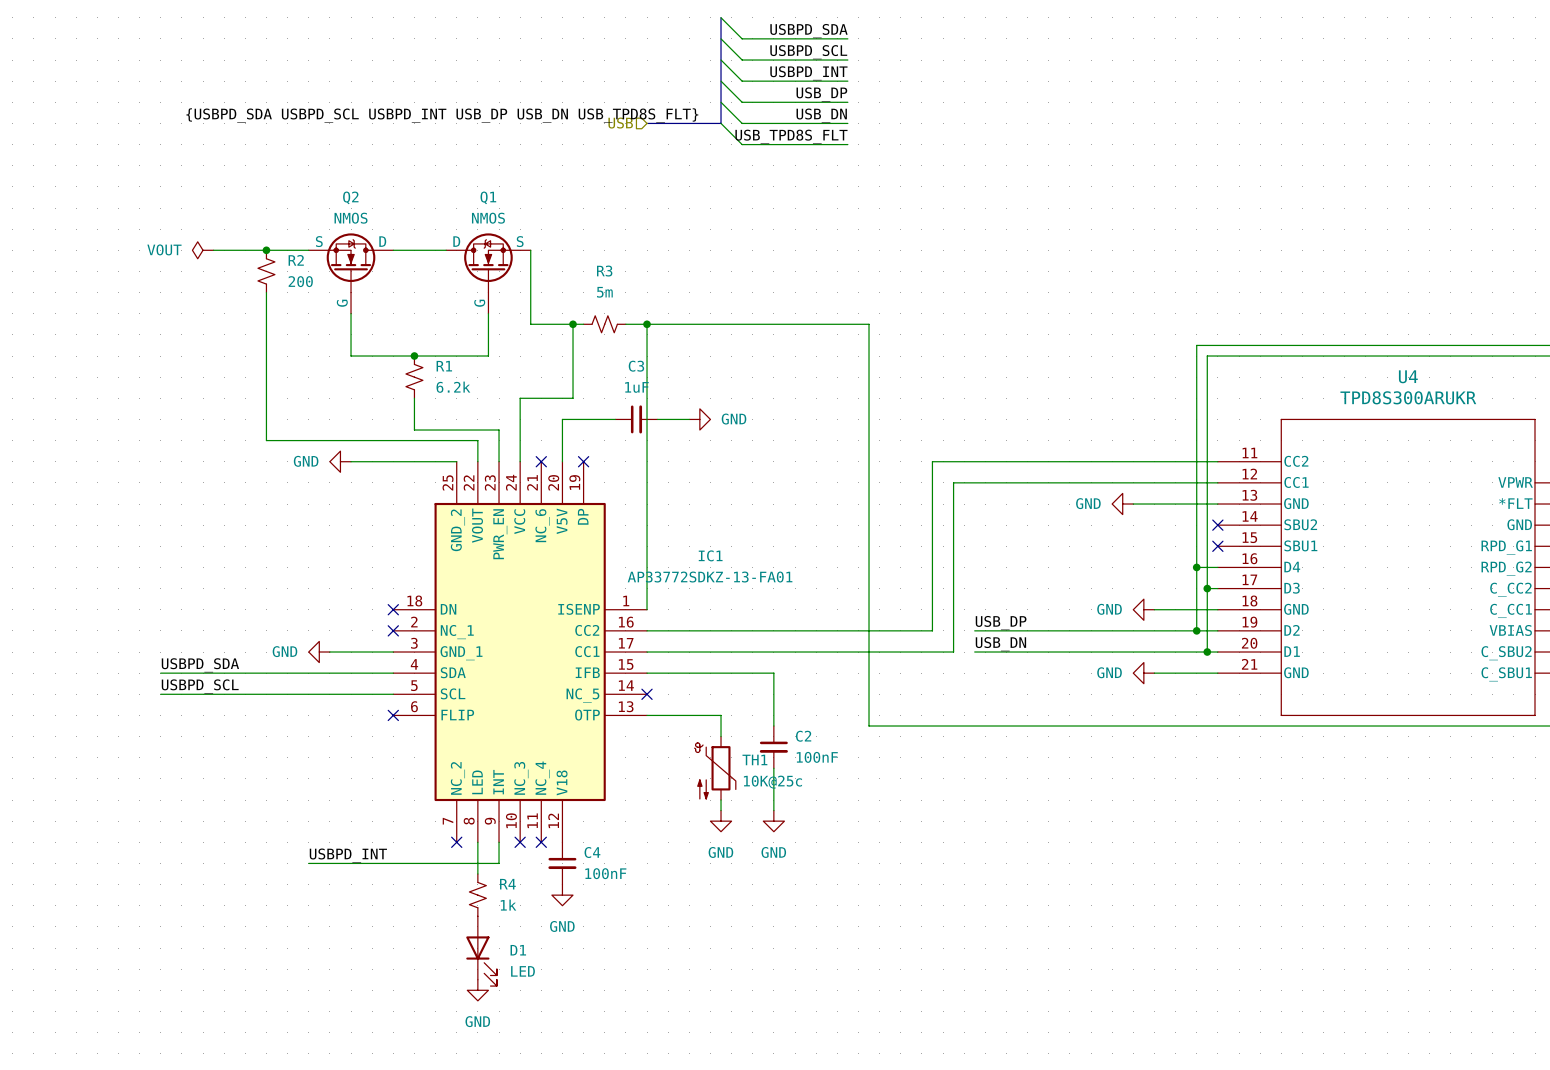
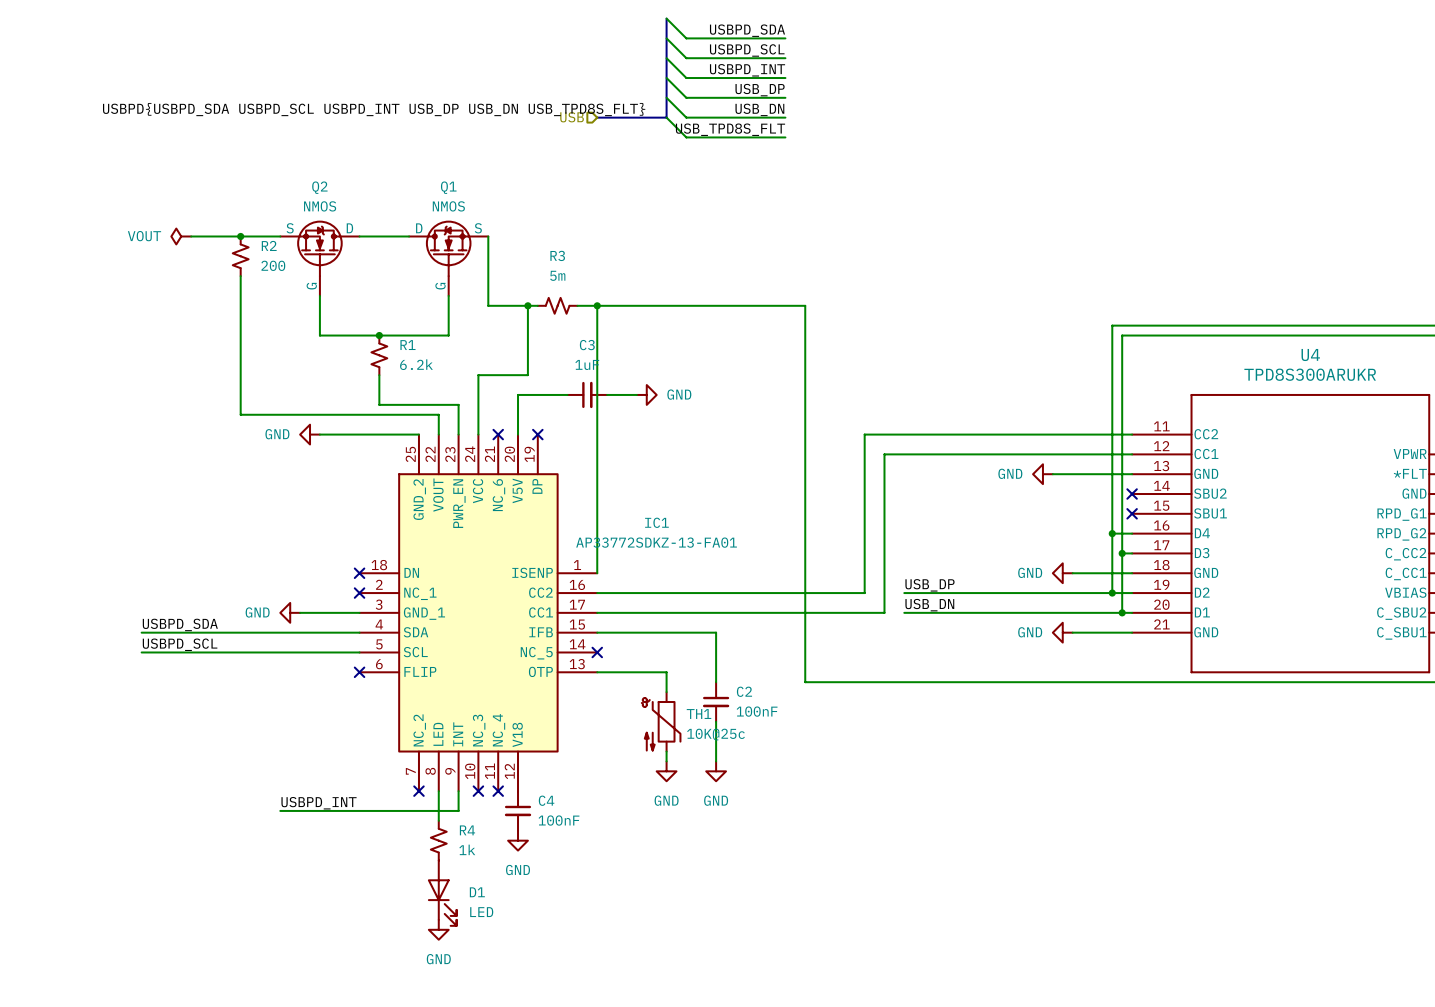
label: {USBPD_SDA USBPD_SCL USBPD_INT USB_DP USB_DN USB_TPD8S_FLT} (442, 115) -> USBPD{USBPD_SDA USBPD_SCL USBPD_INT USB_DP USB_DN USB_TPD8S_FLT} (374, 109)

